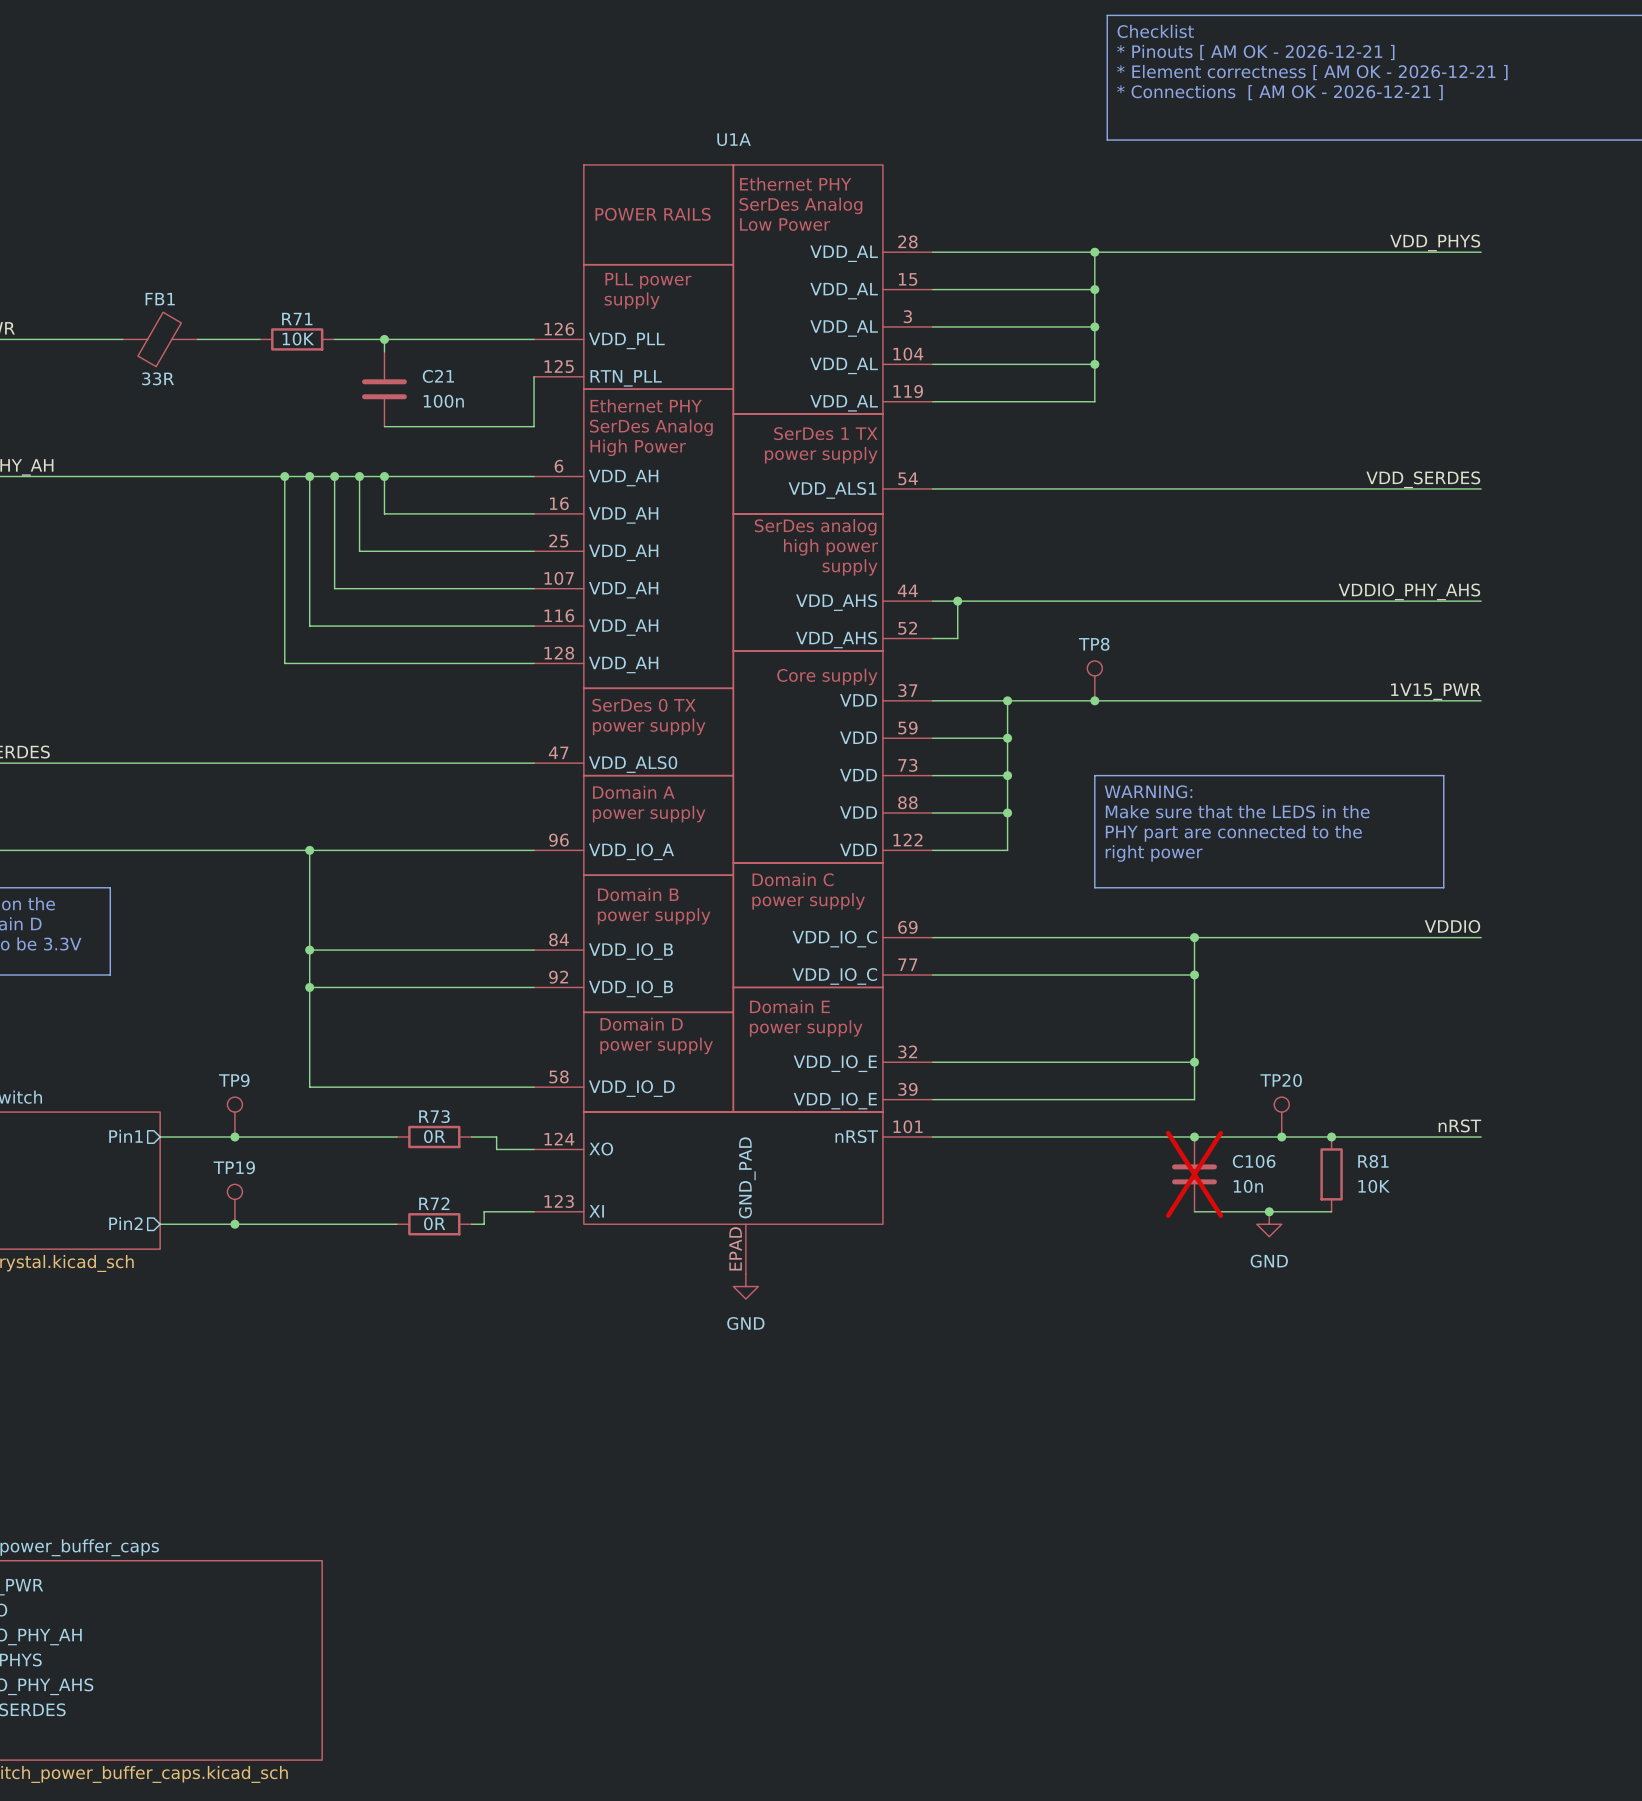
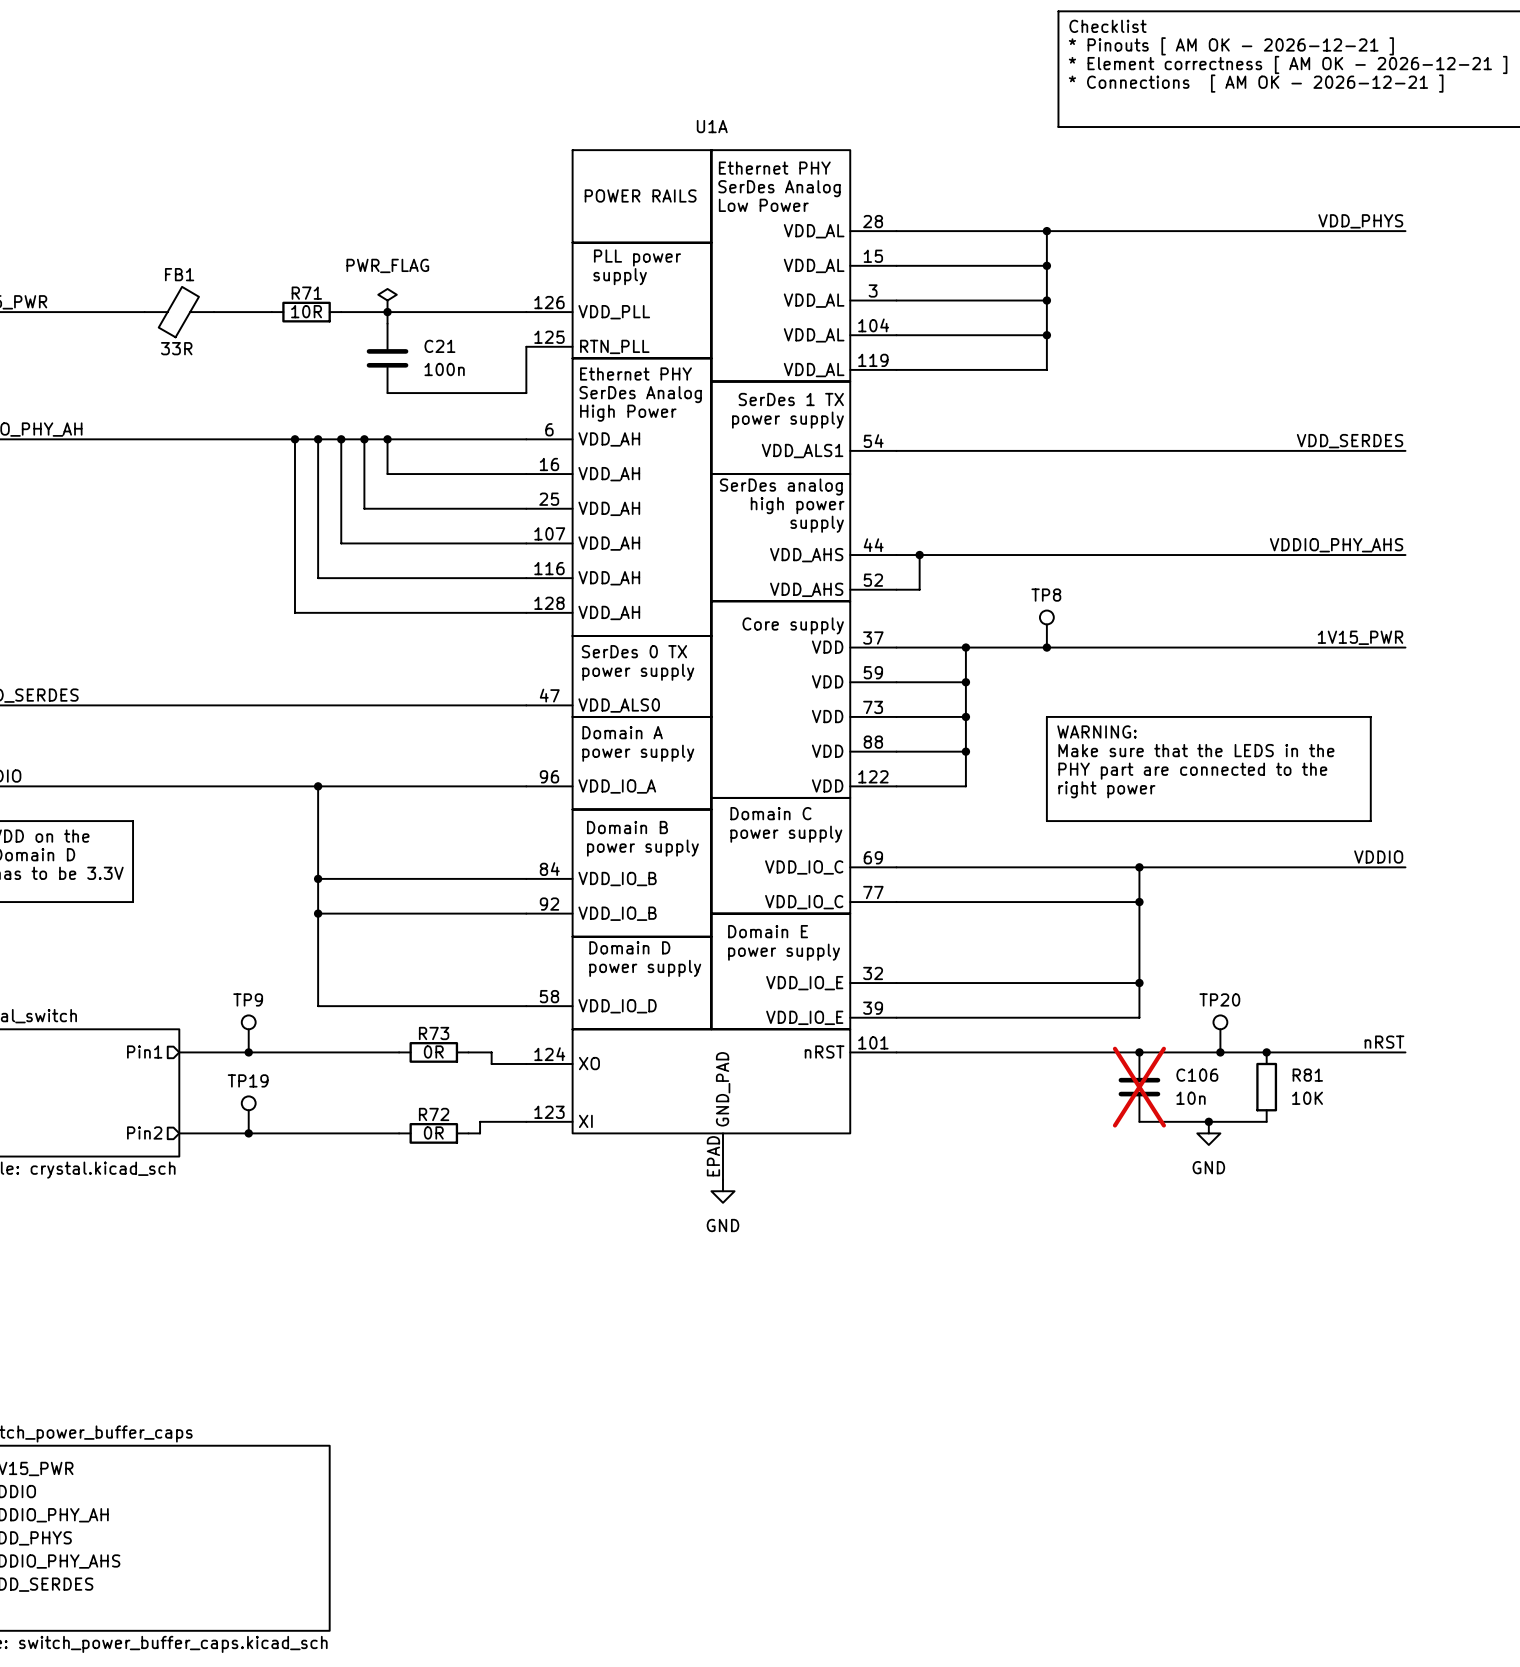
power symbol: none -> PWR_FLAG (387, 300)
R71 value: 10K (298, 338) -> 10R (306, 311)

